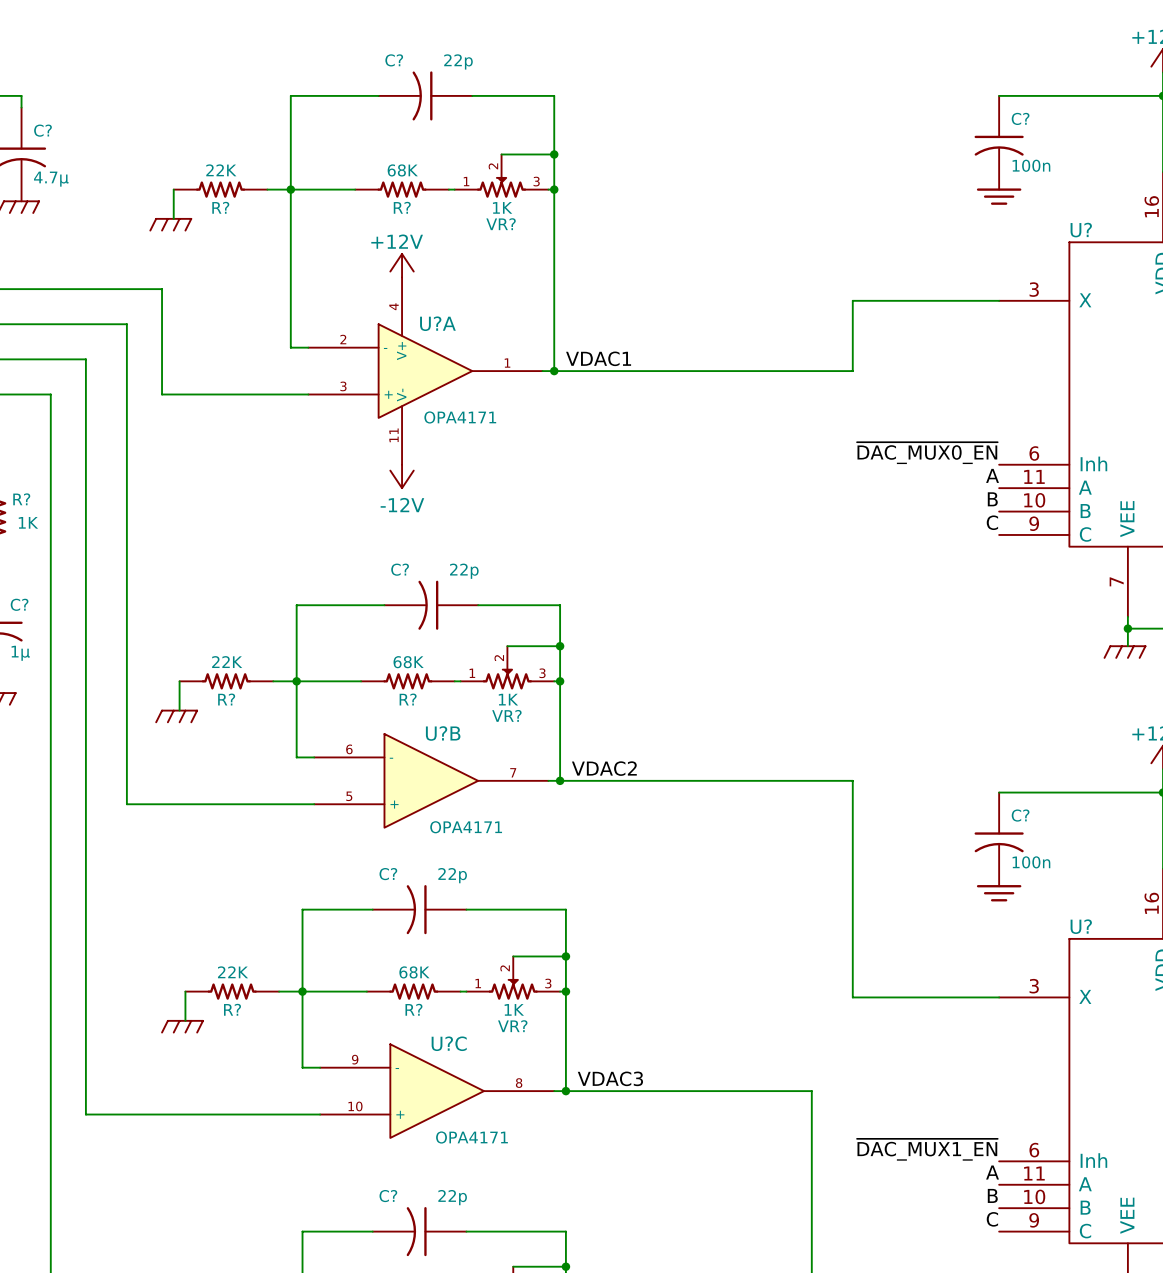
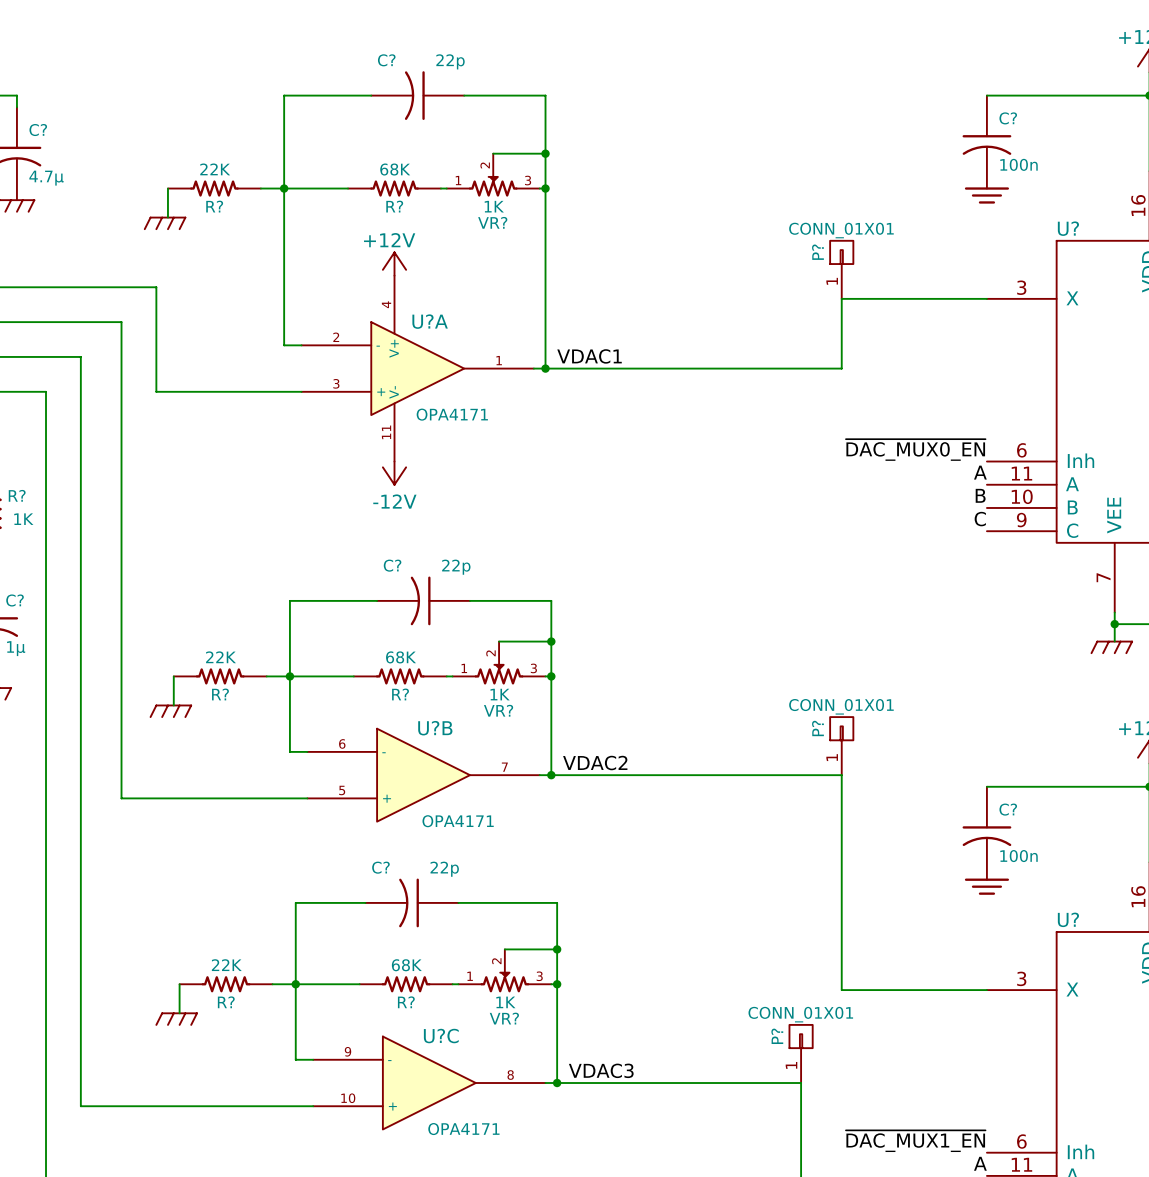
P?: none -> CONN_01X01 (841, 269)
P?: none -> CONN_01X01 (841, 746)
P?: none -> CONN_01X01 (801, 1053)

